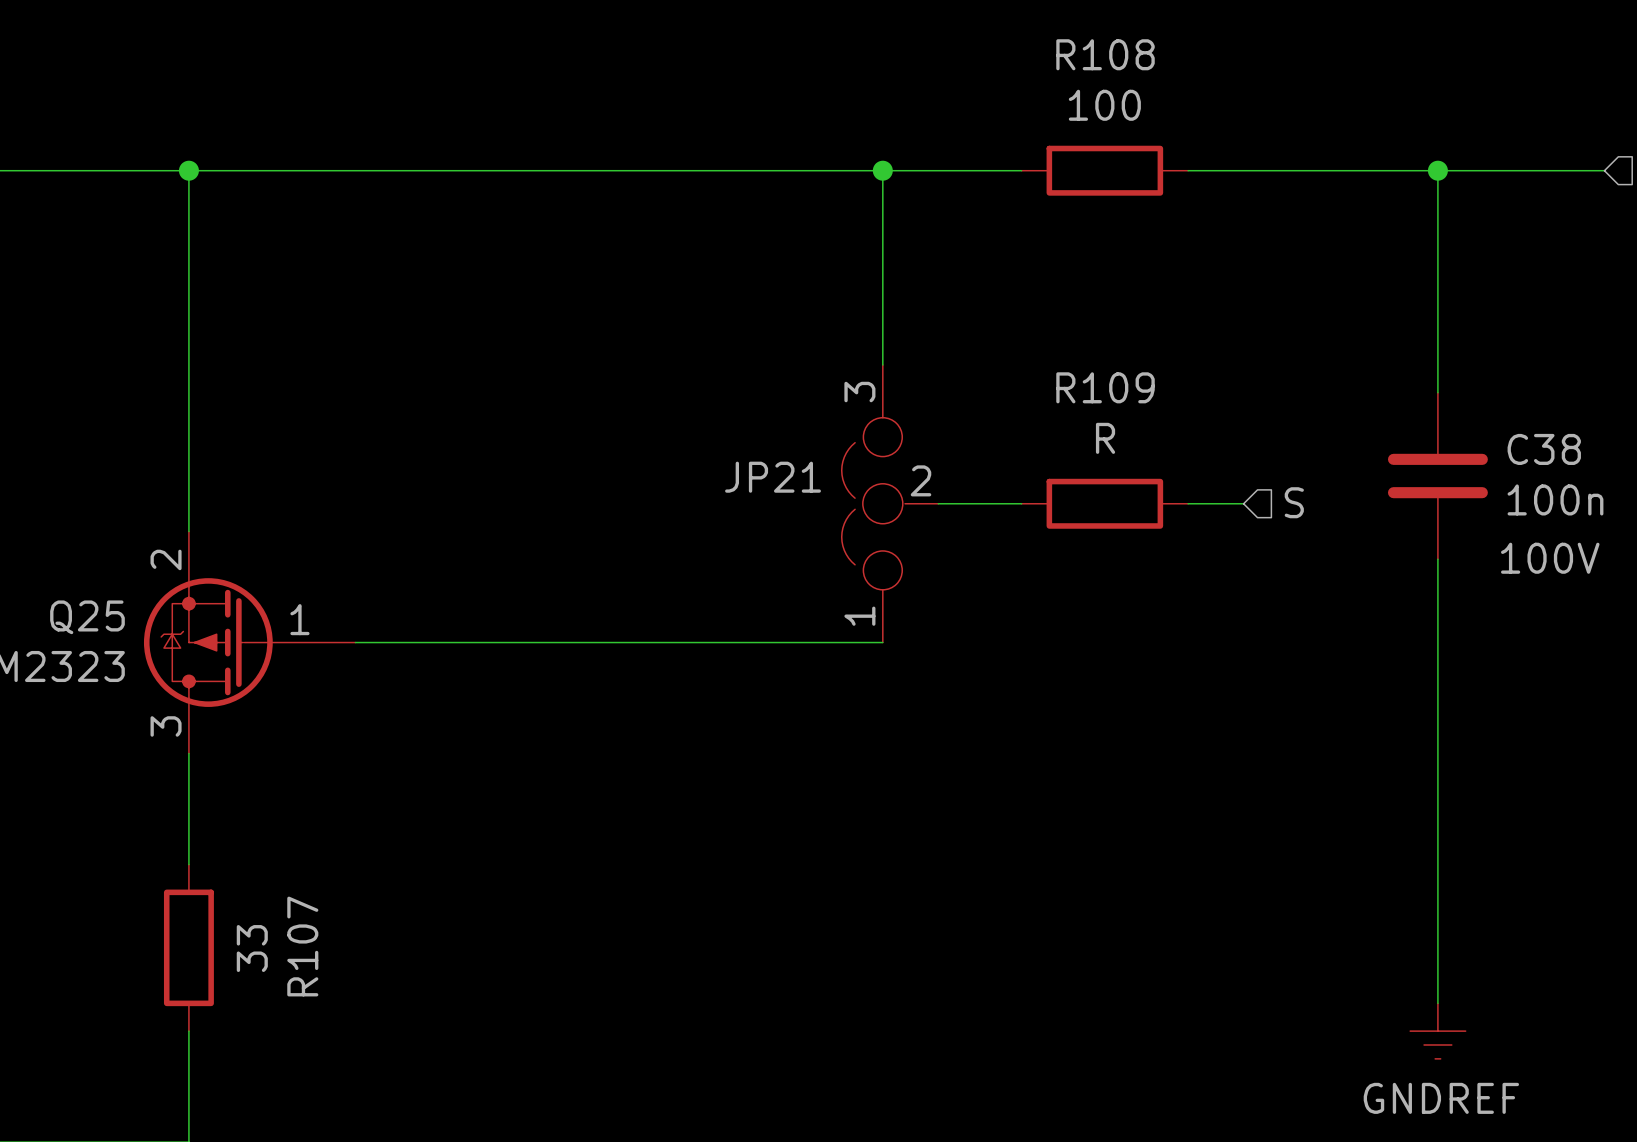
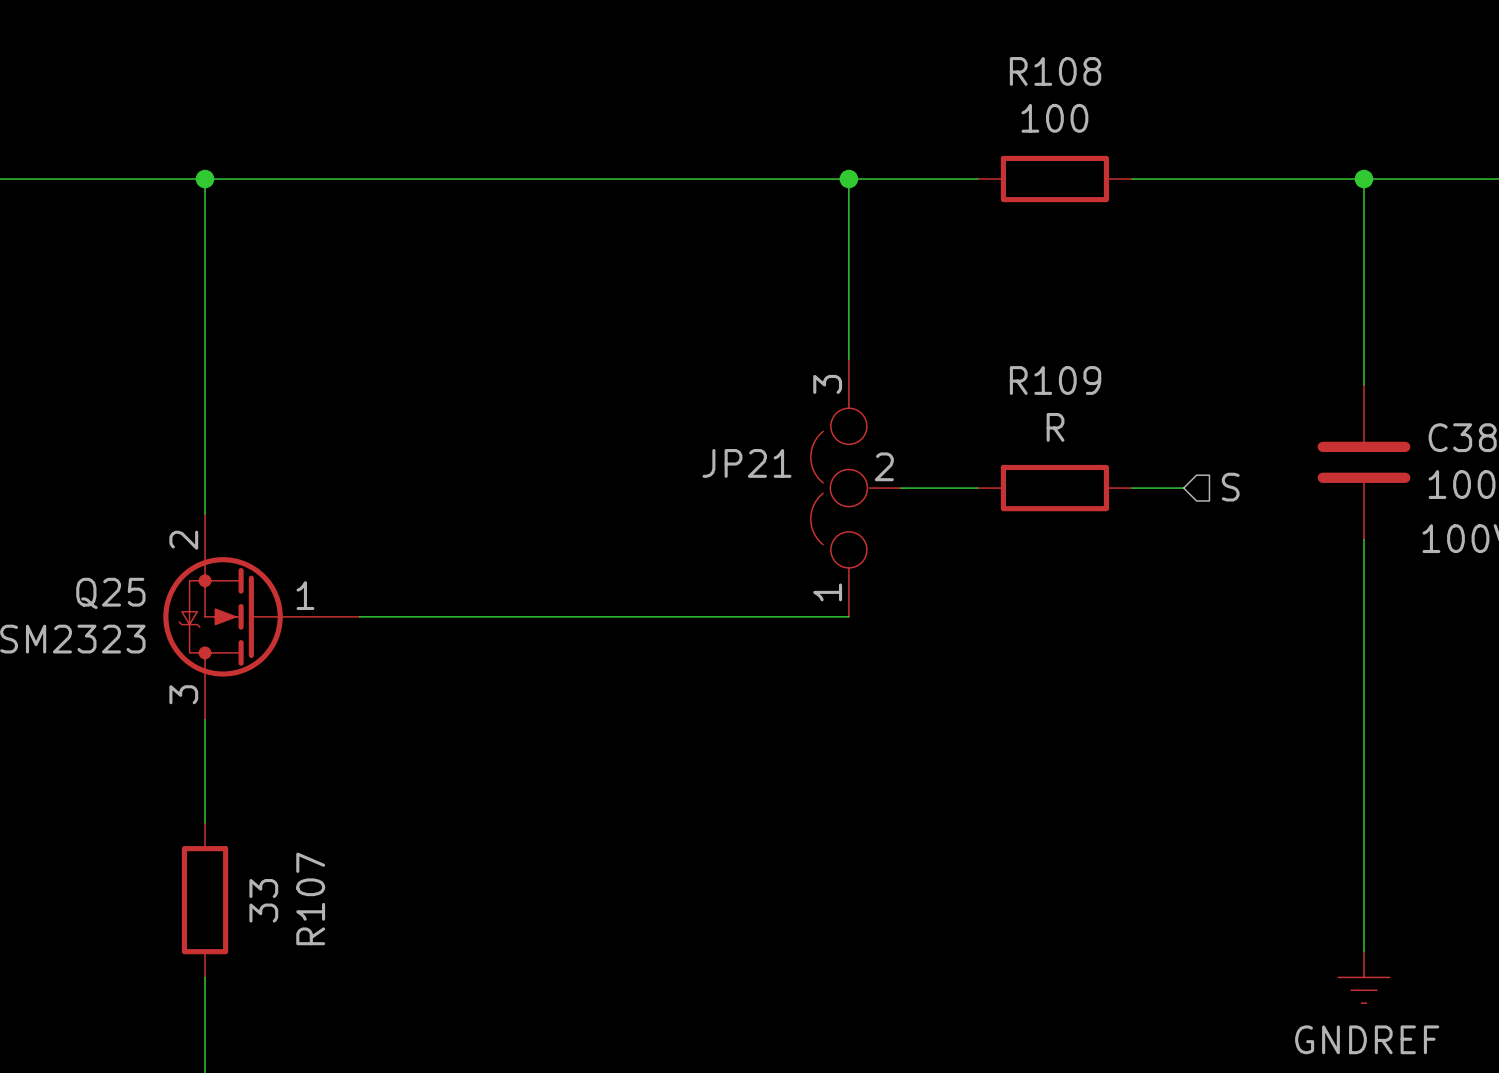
Q25 symbol: [143, 531, 356, 754] -> [163, 513, 360, 720]

